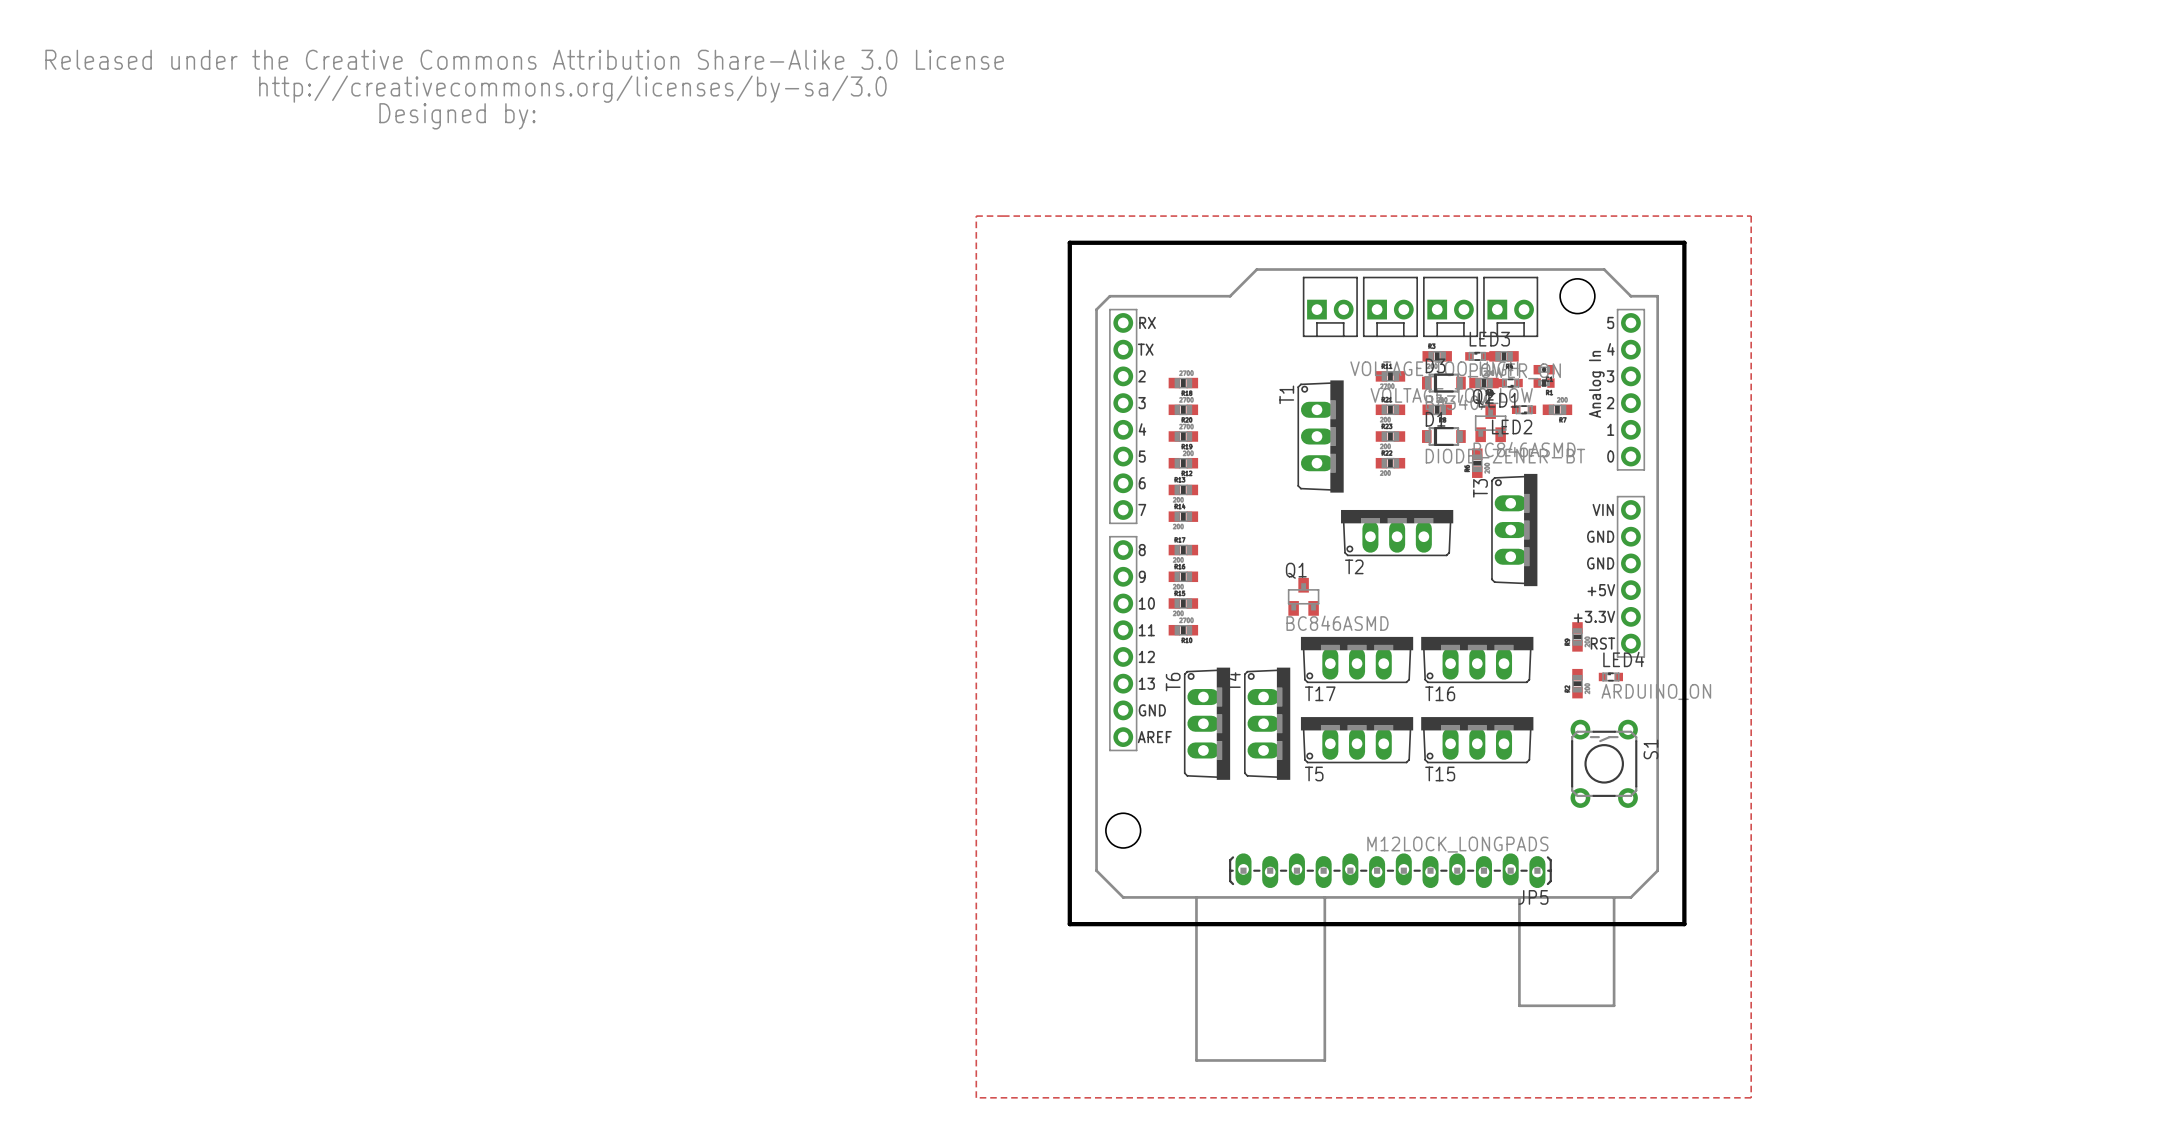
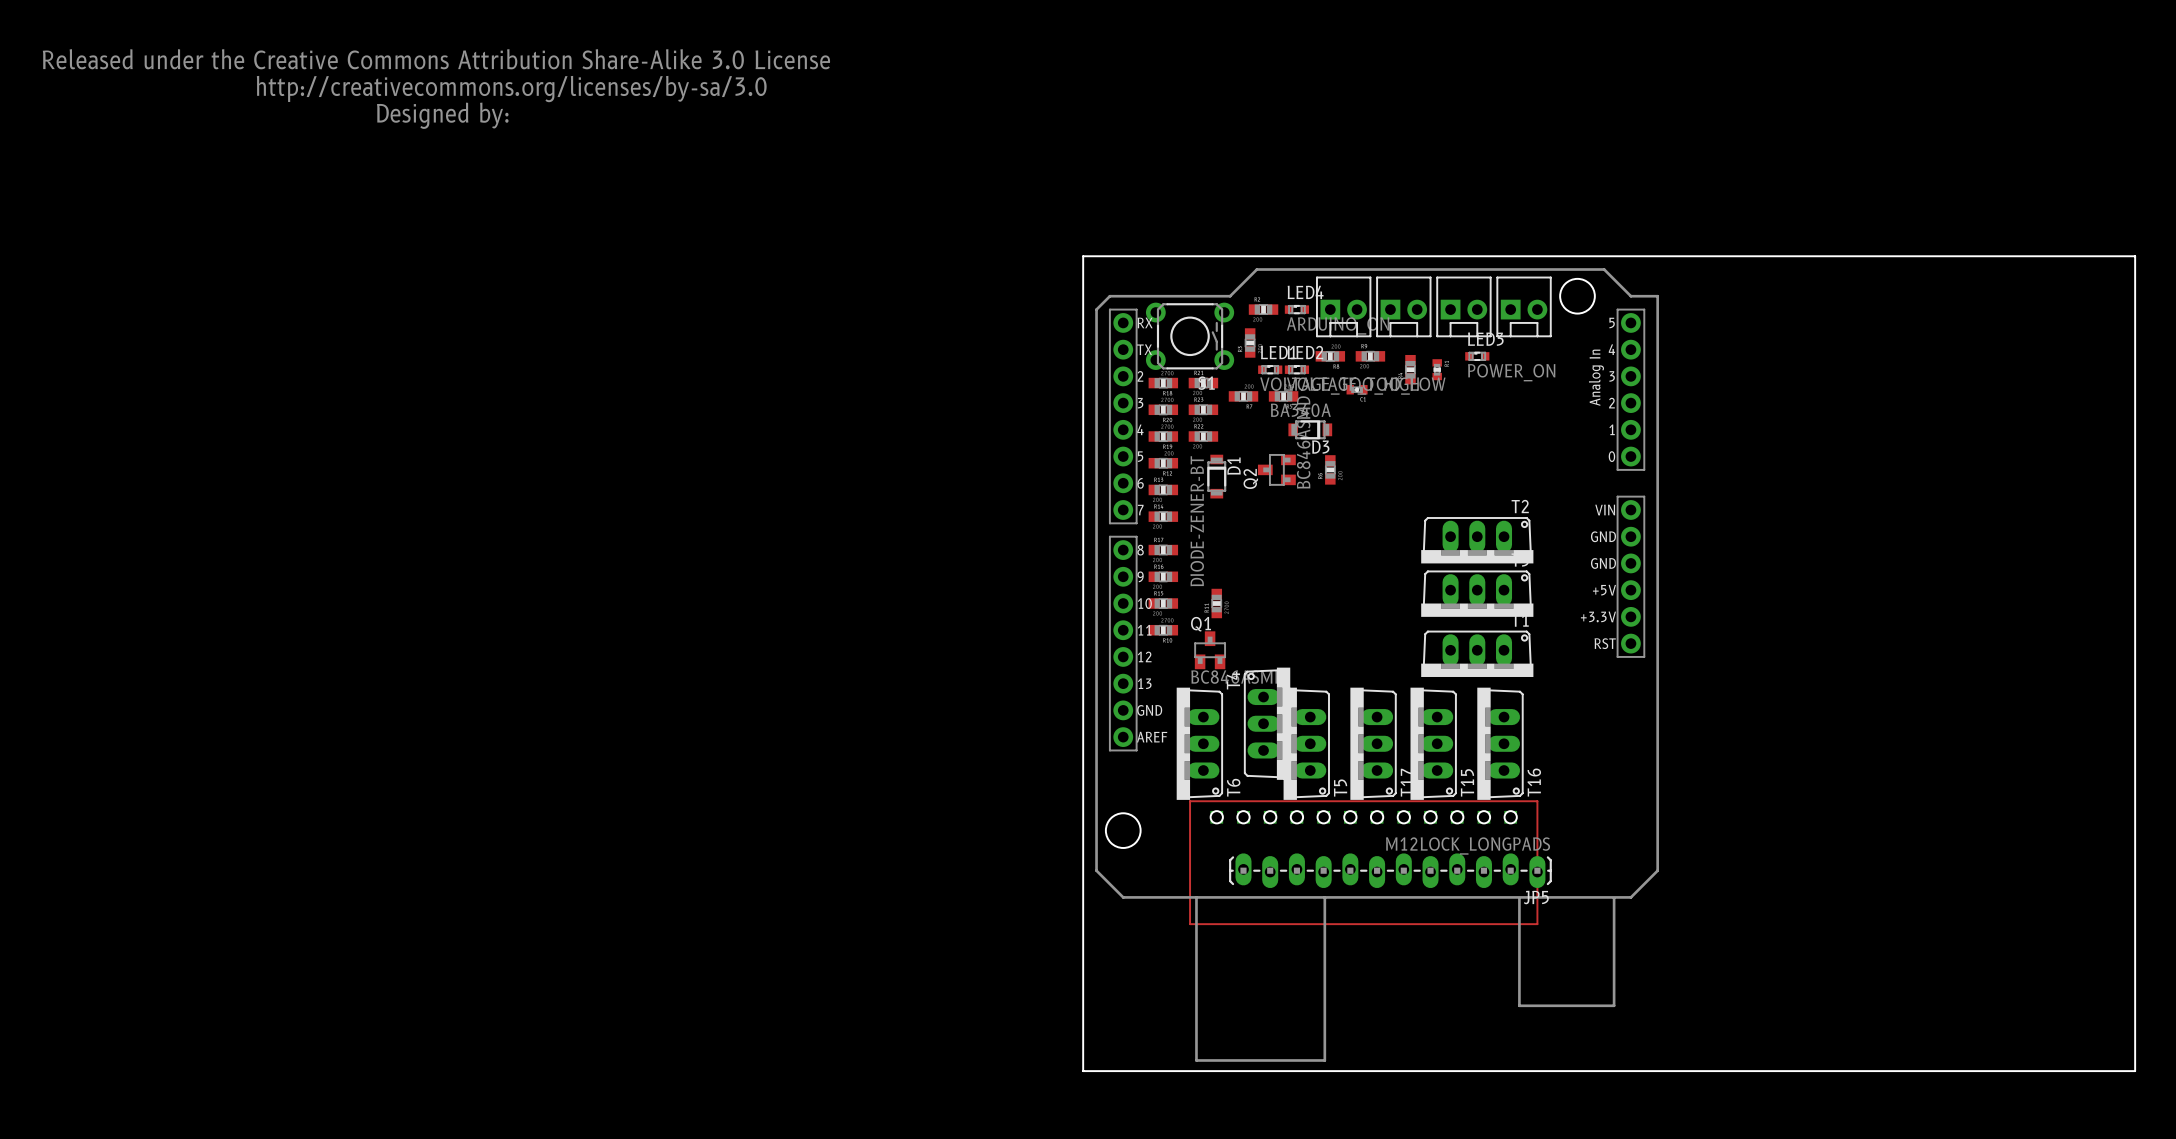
zone outline: (976, 216) (1751, 216) (1751, 1097) (976, 1097) (976, 216) -> none
board edge: (1069, 242) (1684, 242) (1684, 924) (1069, 924) (1069, 242) -> none
board edge: none -> (1083, 256) (2135, 256) (2135, 1071) (1083, 1071) (1083, 256)
part position: (1330, 306) -> (1343, 306)
part position: (1390, 306) -> (1403, 306)
part position: (1450, 306) -> (1463, 306)
part position: (1510, 306) -> (1524, 306)
part rotation: 0° (1437, 356) -> 90° clockwise (1250, 342)
part position: (1437, 356) -> (1250, 342)
part rotation: 0° (1504, 356) -> 90° clockwise (1410, 369)
part position: (1504, 356) -> (1410, 369)
part position: (1544, 369) -> (1357, 389)
part rotation: 0° (1390, 376) -> 90° clockwise (1216, 603)
part position: (1390, 376) -> (1216, 603)
part position: (1183, 383) -> (1163, 383)
D3 rotation: 0° (1443, 383) -> 180° (1310, 429)
D3 position: (1443, 383) -> (1310, 429)
part position: (1483, 383) -> (1283, 396)
LED1 rotation: 0° (1510, 383) -> 180° (1270, 369)
LED1 position: (1510, 383) -> (1270, 369)
part rotation: 0° (1544, 383) -> 90° clockwise (1437, 369)
part position: (1544, 383) -> (1437, 369)
part position: (1183, 409) -> (1163, 409)
part position: (1390, 409) -> (1203, 383)
part position: (1437, 409) -> (1330, 356)
LED2 rotation: 0° (1524, 409) -> 180° (1296, 369)
LED2 position: (1524, 409) -> (1296, 369)
part position: (1557, 409) -> (1243, 396)
Q2 rotation: 0° (1490, 423) -> 90° counterclockwise (1276, 469)
Q2 position: (1490, 423) -> (1276, 469)
part position: (1183, 436) -> (1163, 436)
T1 rotation: 0° (1320, 436) -> 90° clockwise (1477, 653)
T1 position: (1320, 436) -> (1477, 653)
part position: (1390, 436) -> (1203, 409)
D1 rotation: 0° (1443, 436) -> 90° clockwise (1216, 476)
D1 position: (1443, 436) -> (1216, 476)
part position: (1183, 463) -> (1163, 463)
part position: (1390, 463) -> (1203, 436)
part position: (1477, 463) -> (1330, 469)
part position: (1183, 489) -> (1163, 489)
part position: (1183, 516) -> (1163, 516)
T3 rotation: 0° (1514, 530) -> 90° clockwise (1477, 593)
T3 position: (1514, 530) -> (1477, 593)
T2 rotation: 0° (1397, 533) -> 180° (1477, 540)
T2 position: (1397, 533) -> (1477, 540)
part position: (1183, 550) -> (1163, 550)
part position: (1183, 576) -> (1163, 576)
Q1 position: (1303, 596) -> (1210, 650)
part position: (1183, 603) -> (1163, 603)
part position: (1183, 630) -> (1163, 630)
part rotation: 0° (1577, 636) -> 90° clockwise (1370, 356)
part position: (1577, 636) -> (1370, 356)
T17 rotation: 0° (1357, 659) -> 90° counterclockwise (1373, 743)
T17 position: (1357, 659) -> (1373, 743)
T16 rotation: 0° (1477, 659) -> 90° counterclockwise (1500, 743)
T16 position: (1477, 659) -> (1500, 743)
LED4 position: (1610, 676) -> (1296, 309)
part rotation: 0° (1577, 683) -> 90° clockwise (1263, 309)
part position: (1577, 683) -> (1263, 309)
T6 rotation: 0° (1207, 723) -> 180° (1199, 743)
T5 rotation: 0° (1357, 740) -> 90° counterclockwise (1306, 743)
T15 rotation: 0° (1477, 740) -> 90° counterclockwise (1433, 743)
S1 rotation: 0° (1604, 763) -> 90° clockwise (1190, 336)
S1 position: (1604, 763) -> (1190, 336)
part: none -> (1363, 862)

